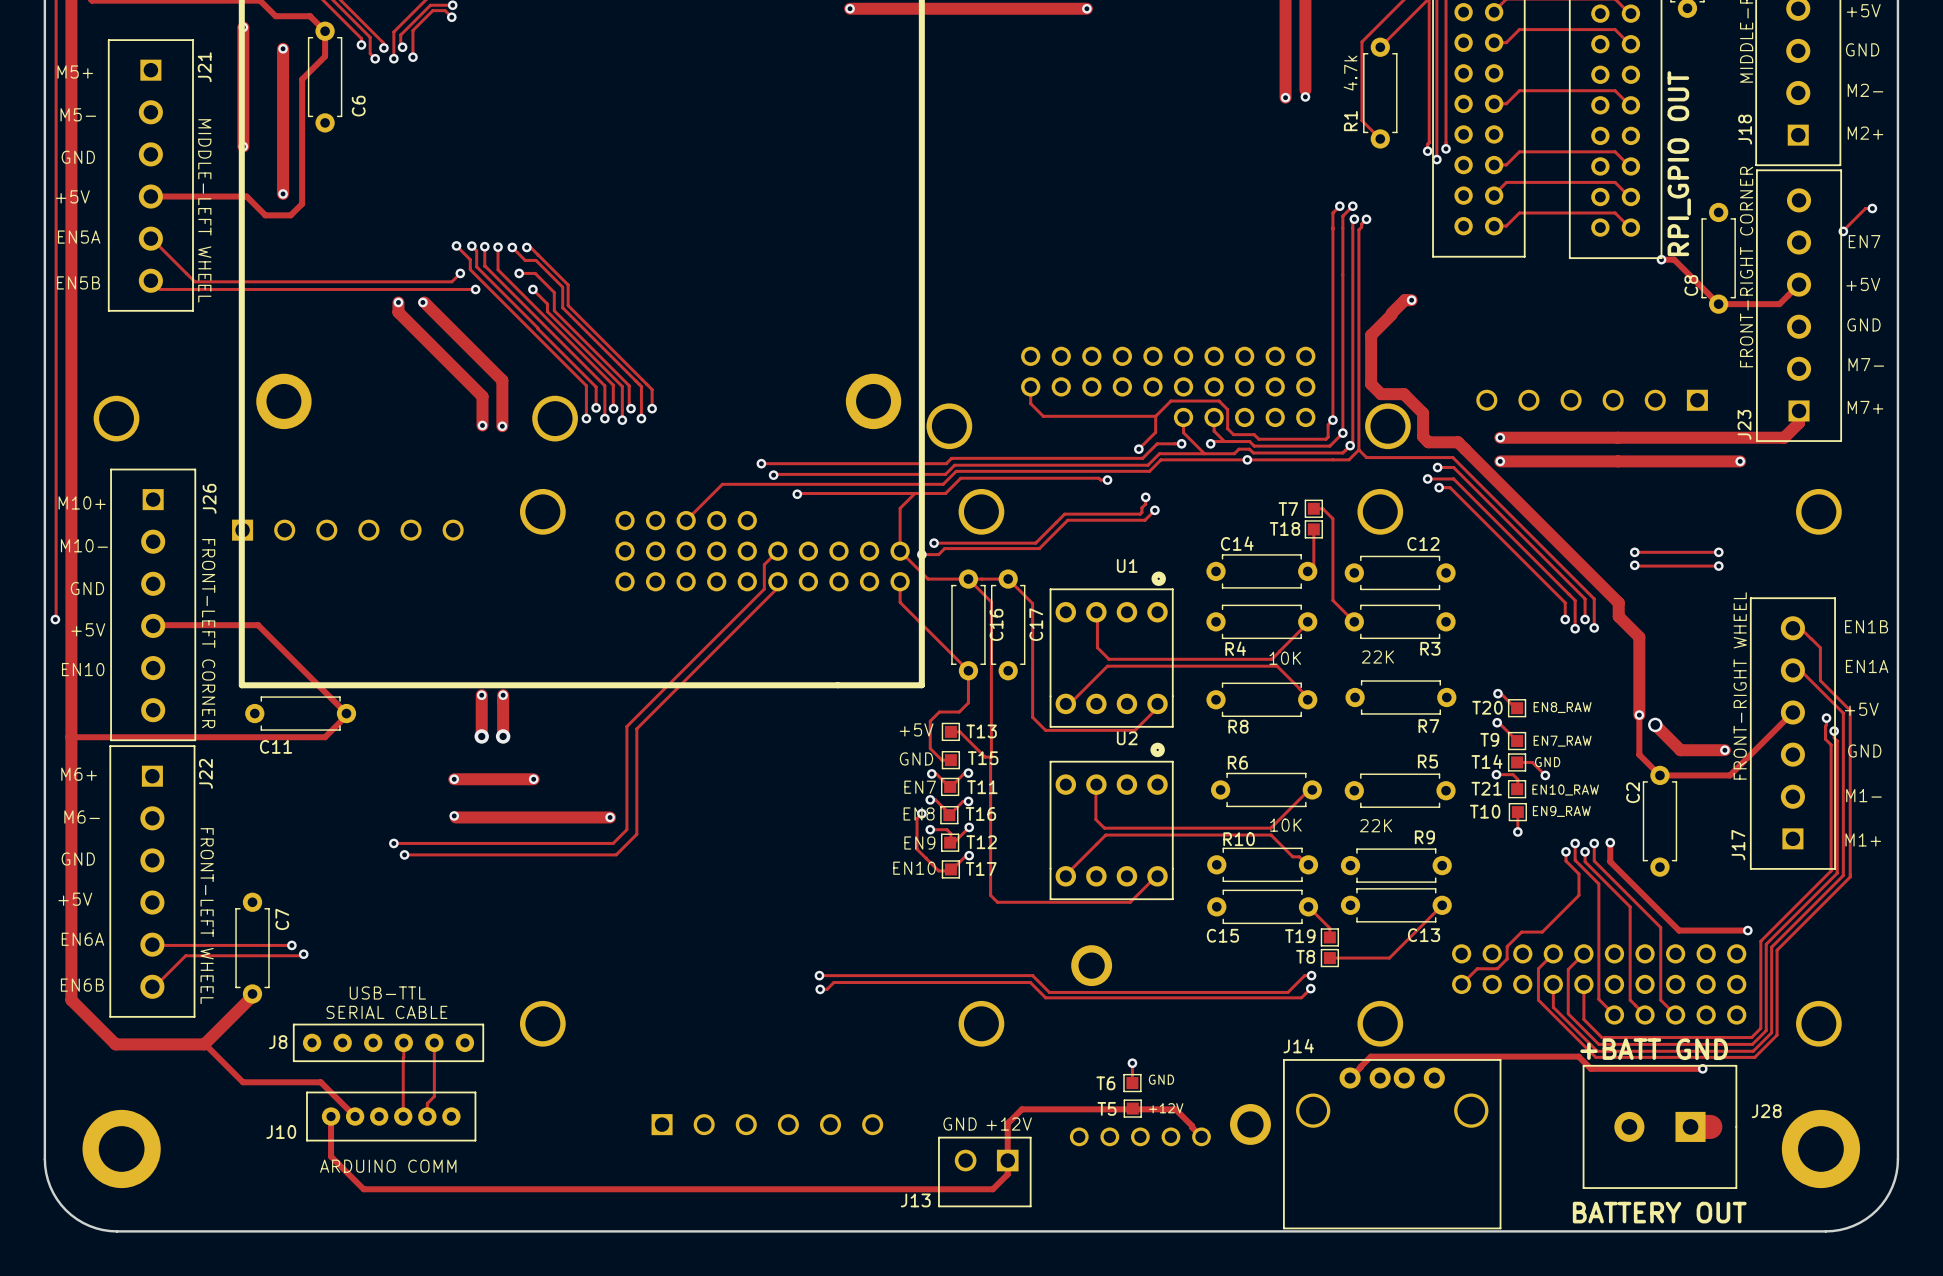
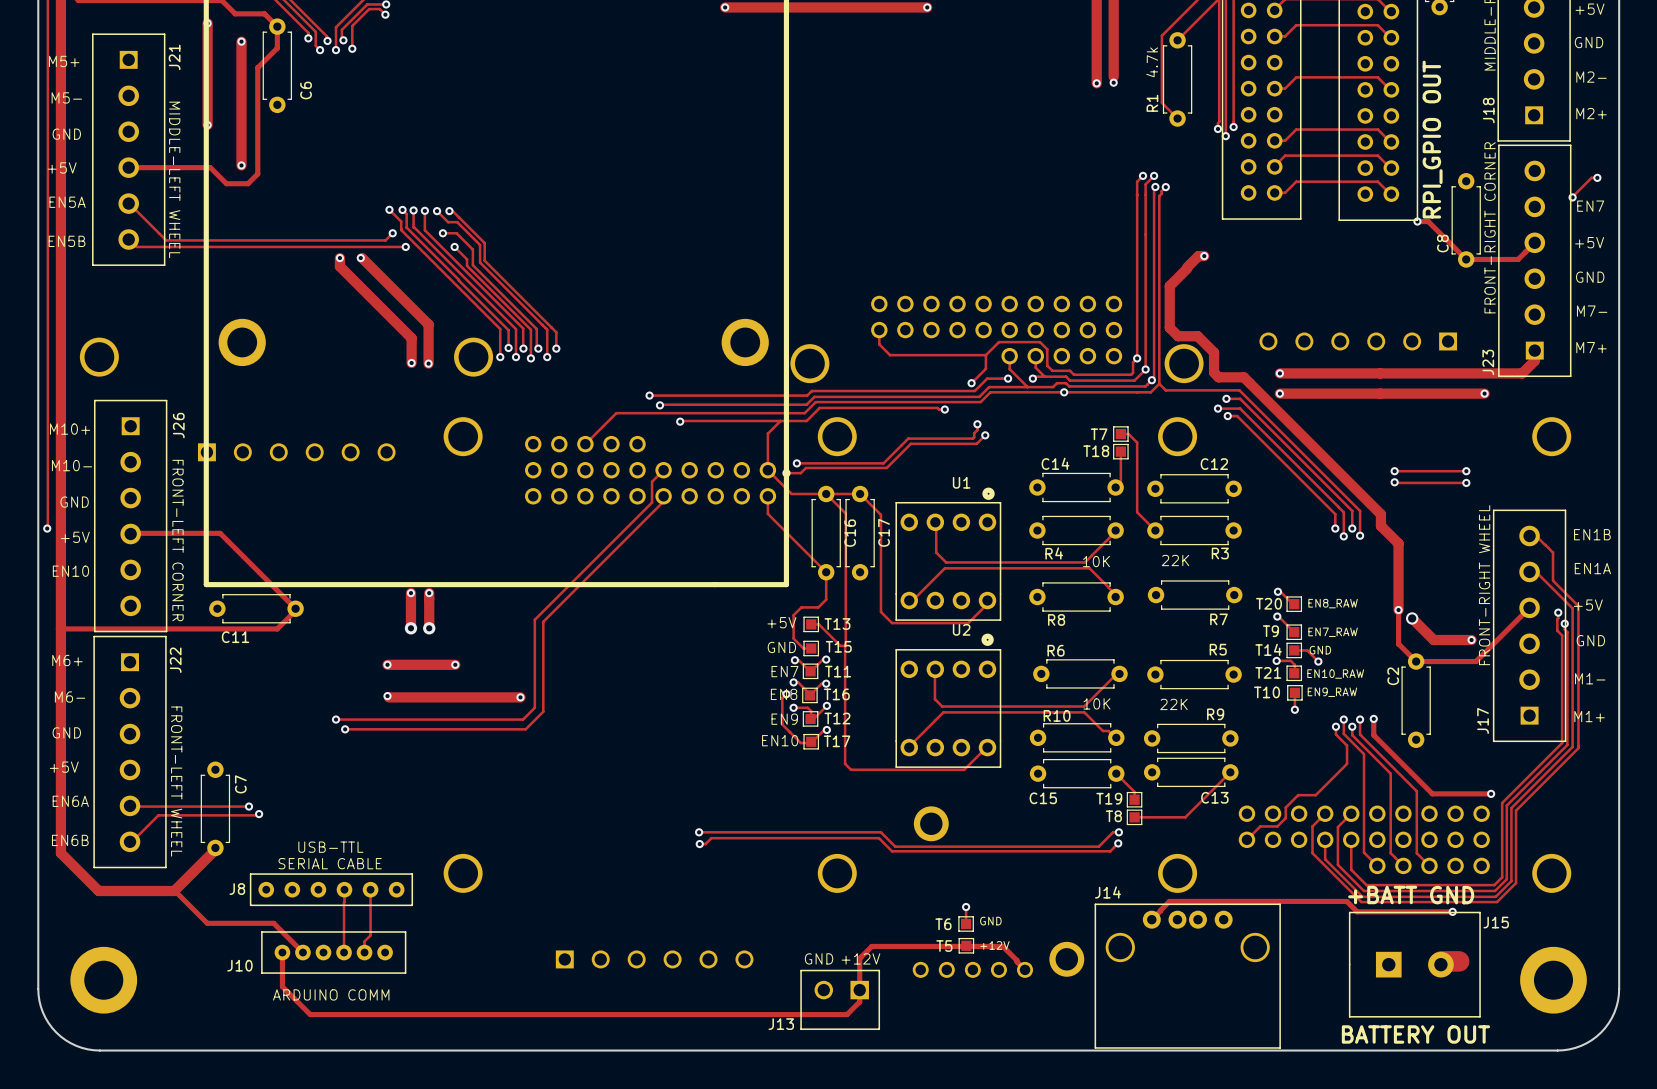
J28: (1659, 1126) -> none
J15: none -> (1414, 964)

